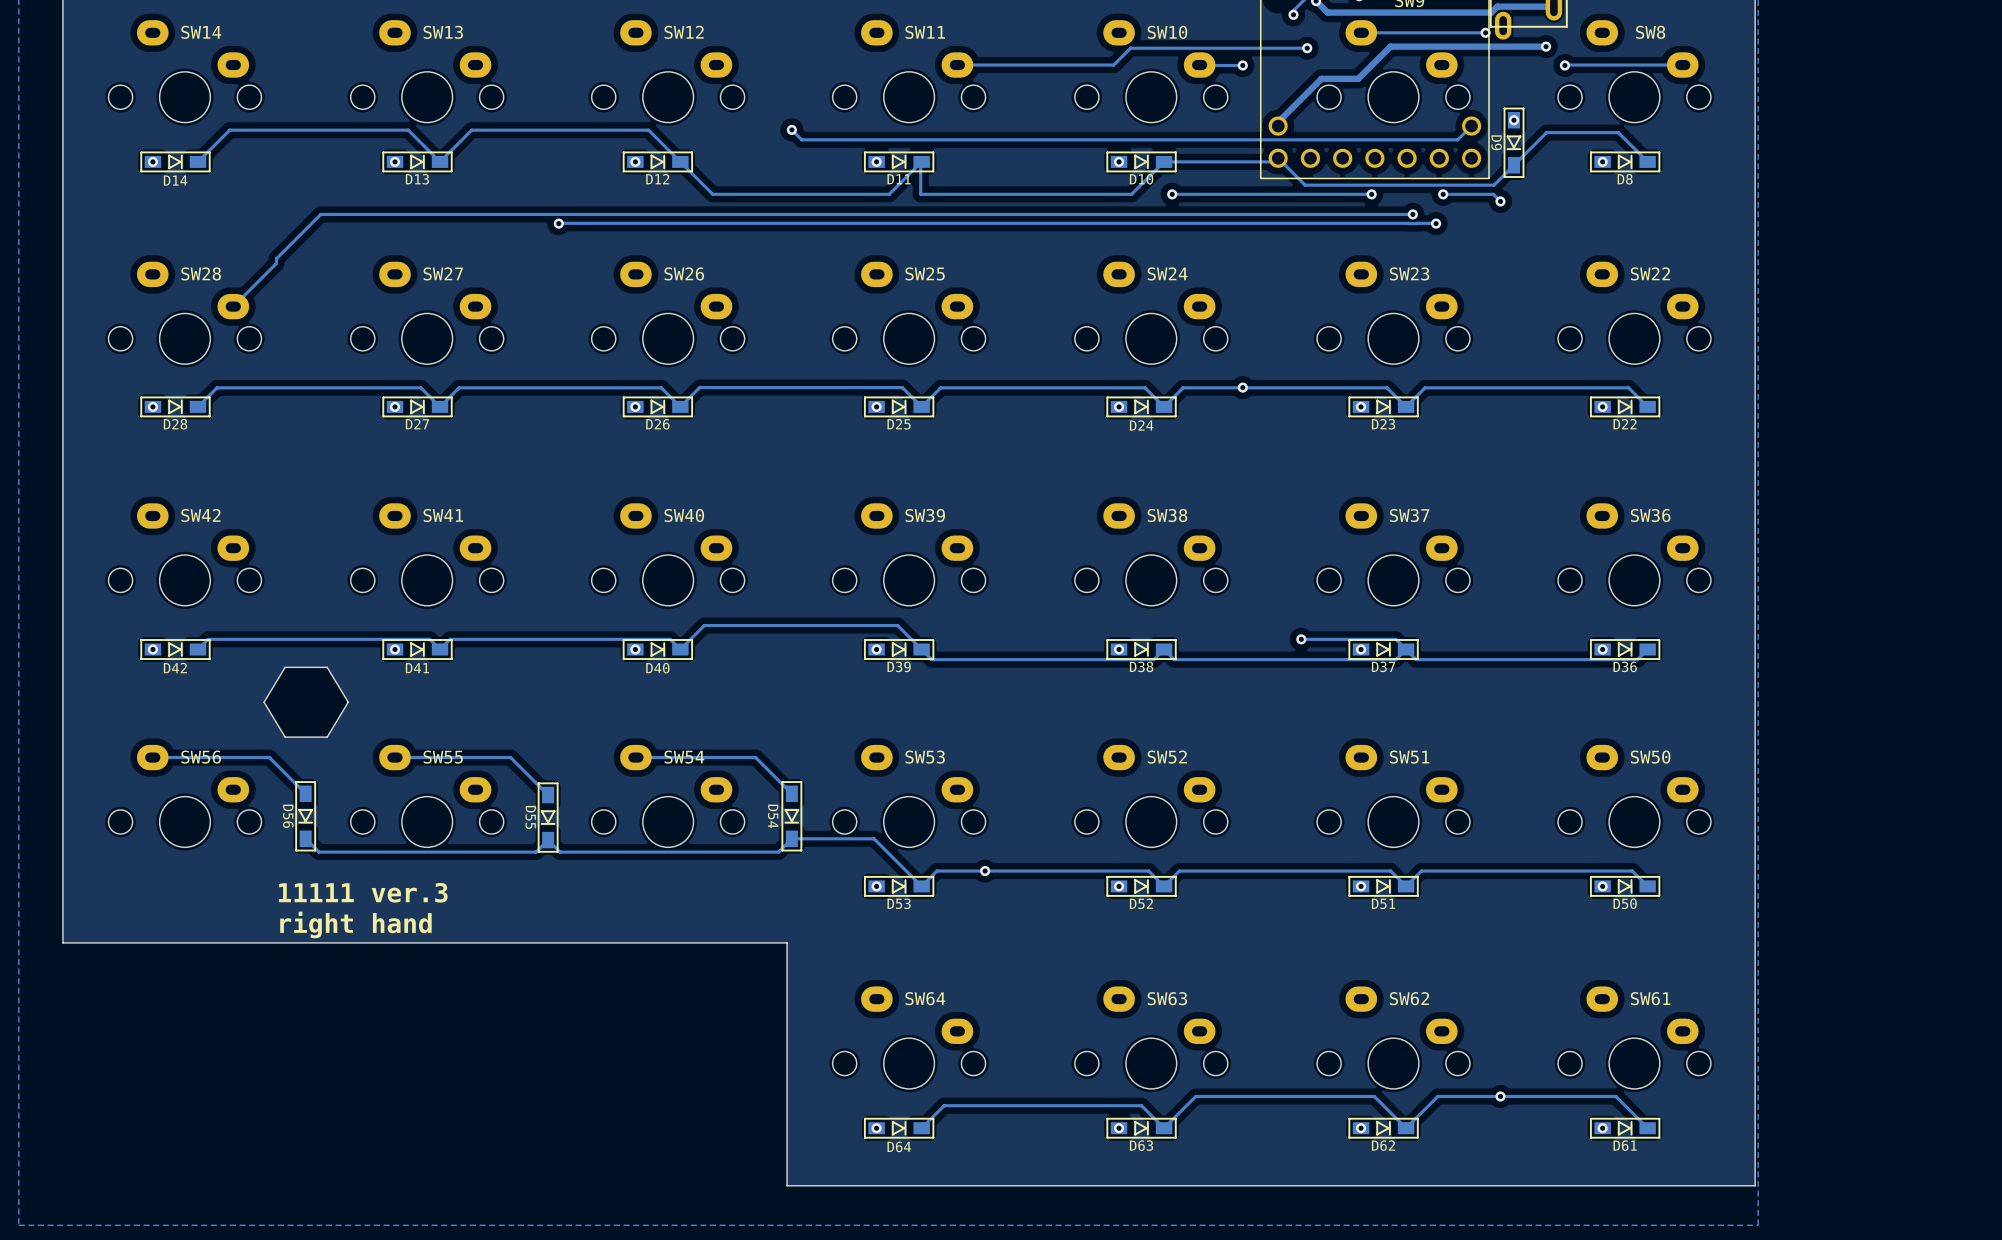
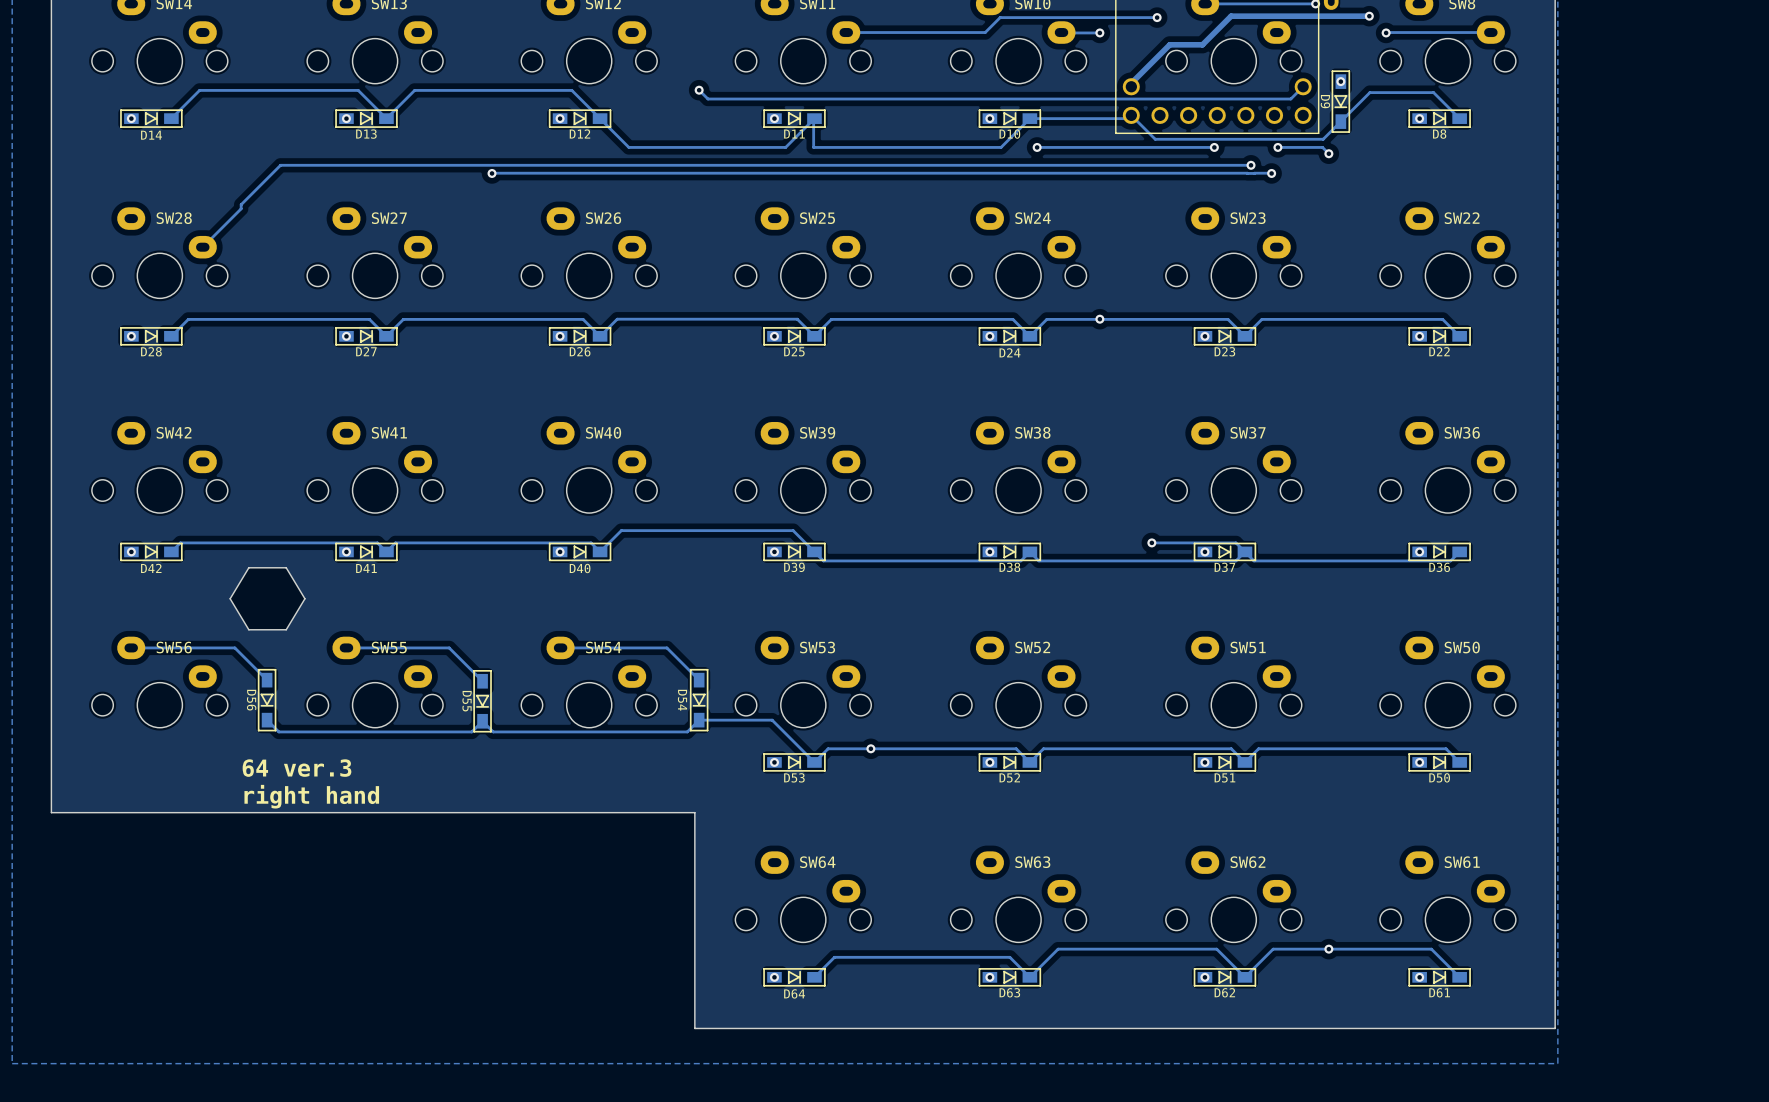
text: 11111 ver.3 (363, 892) -> 64 ver.3 (296, 768)

